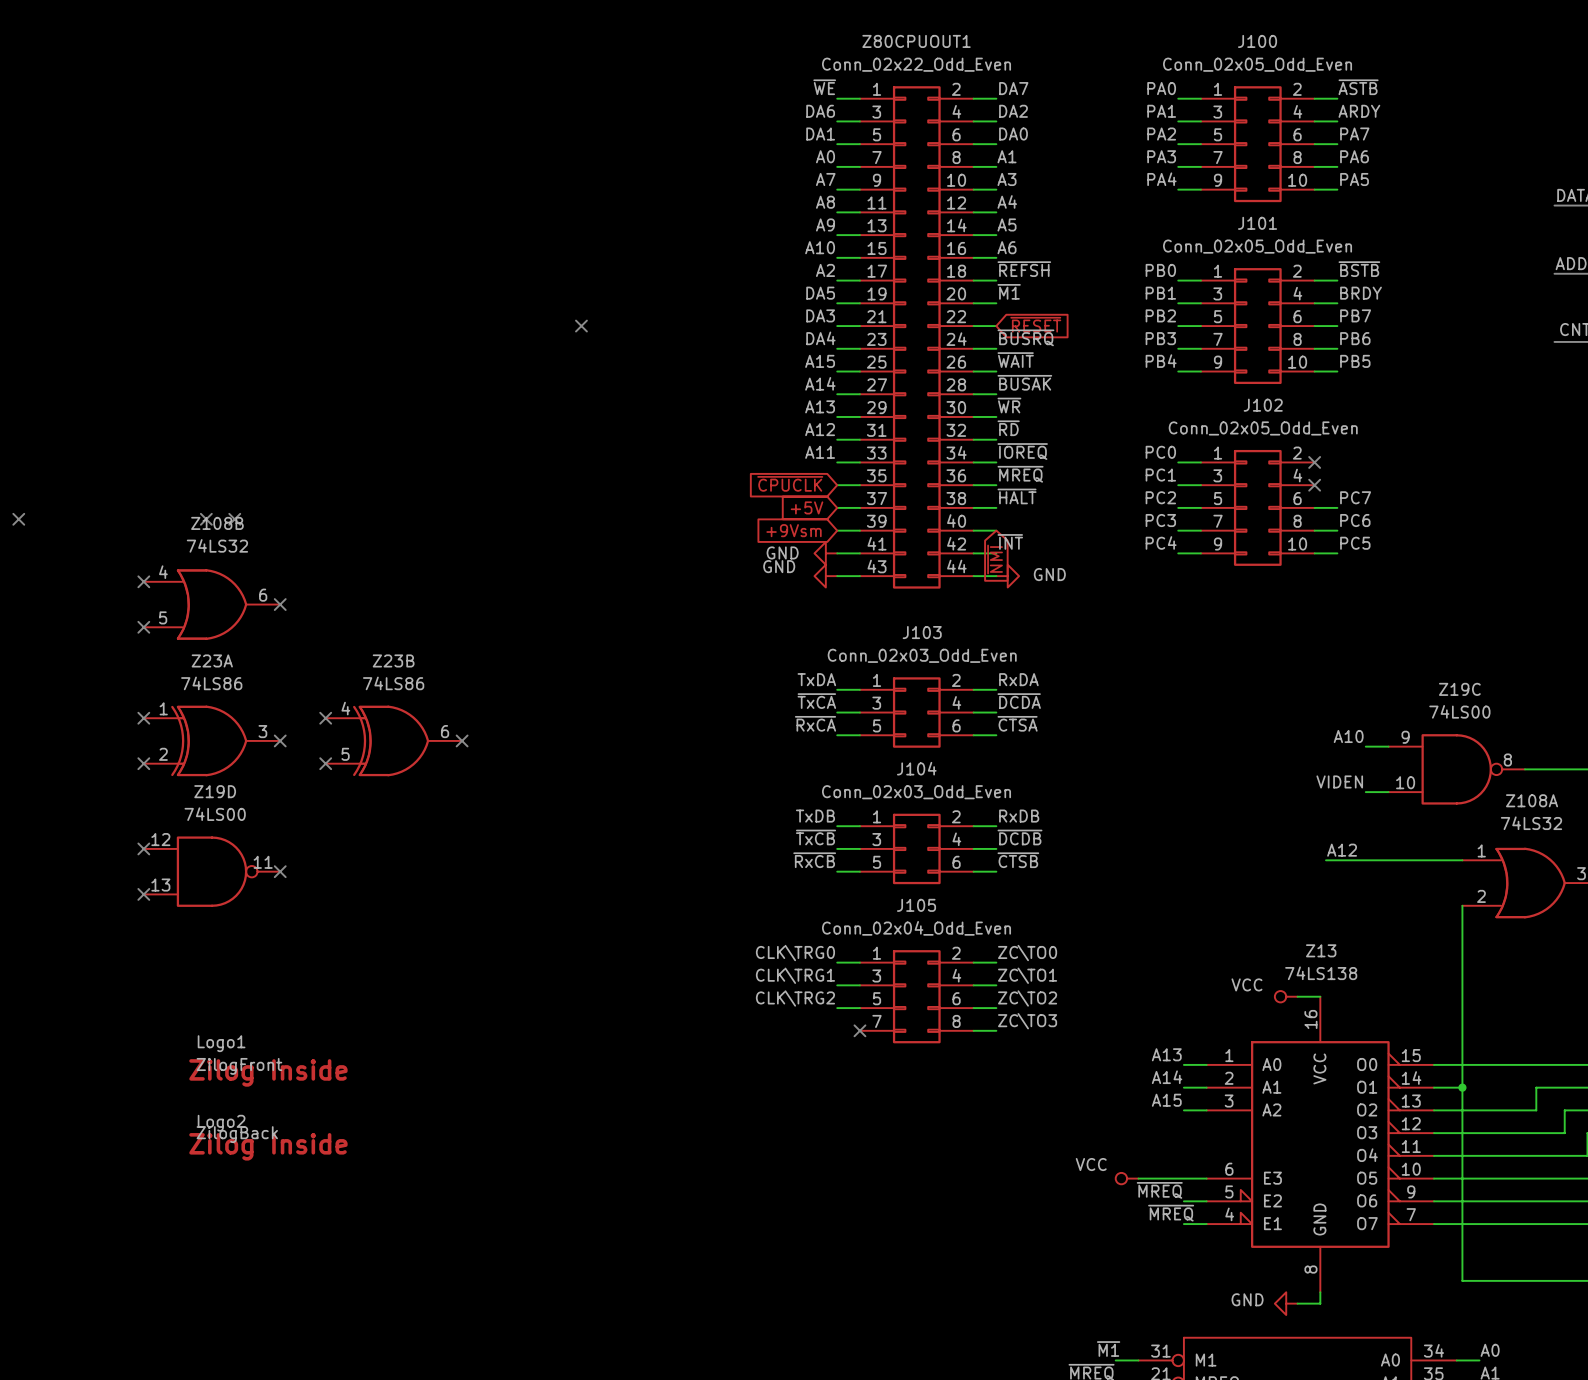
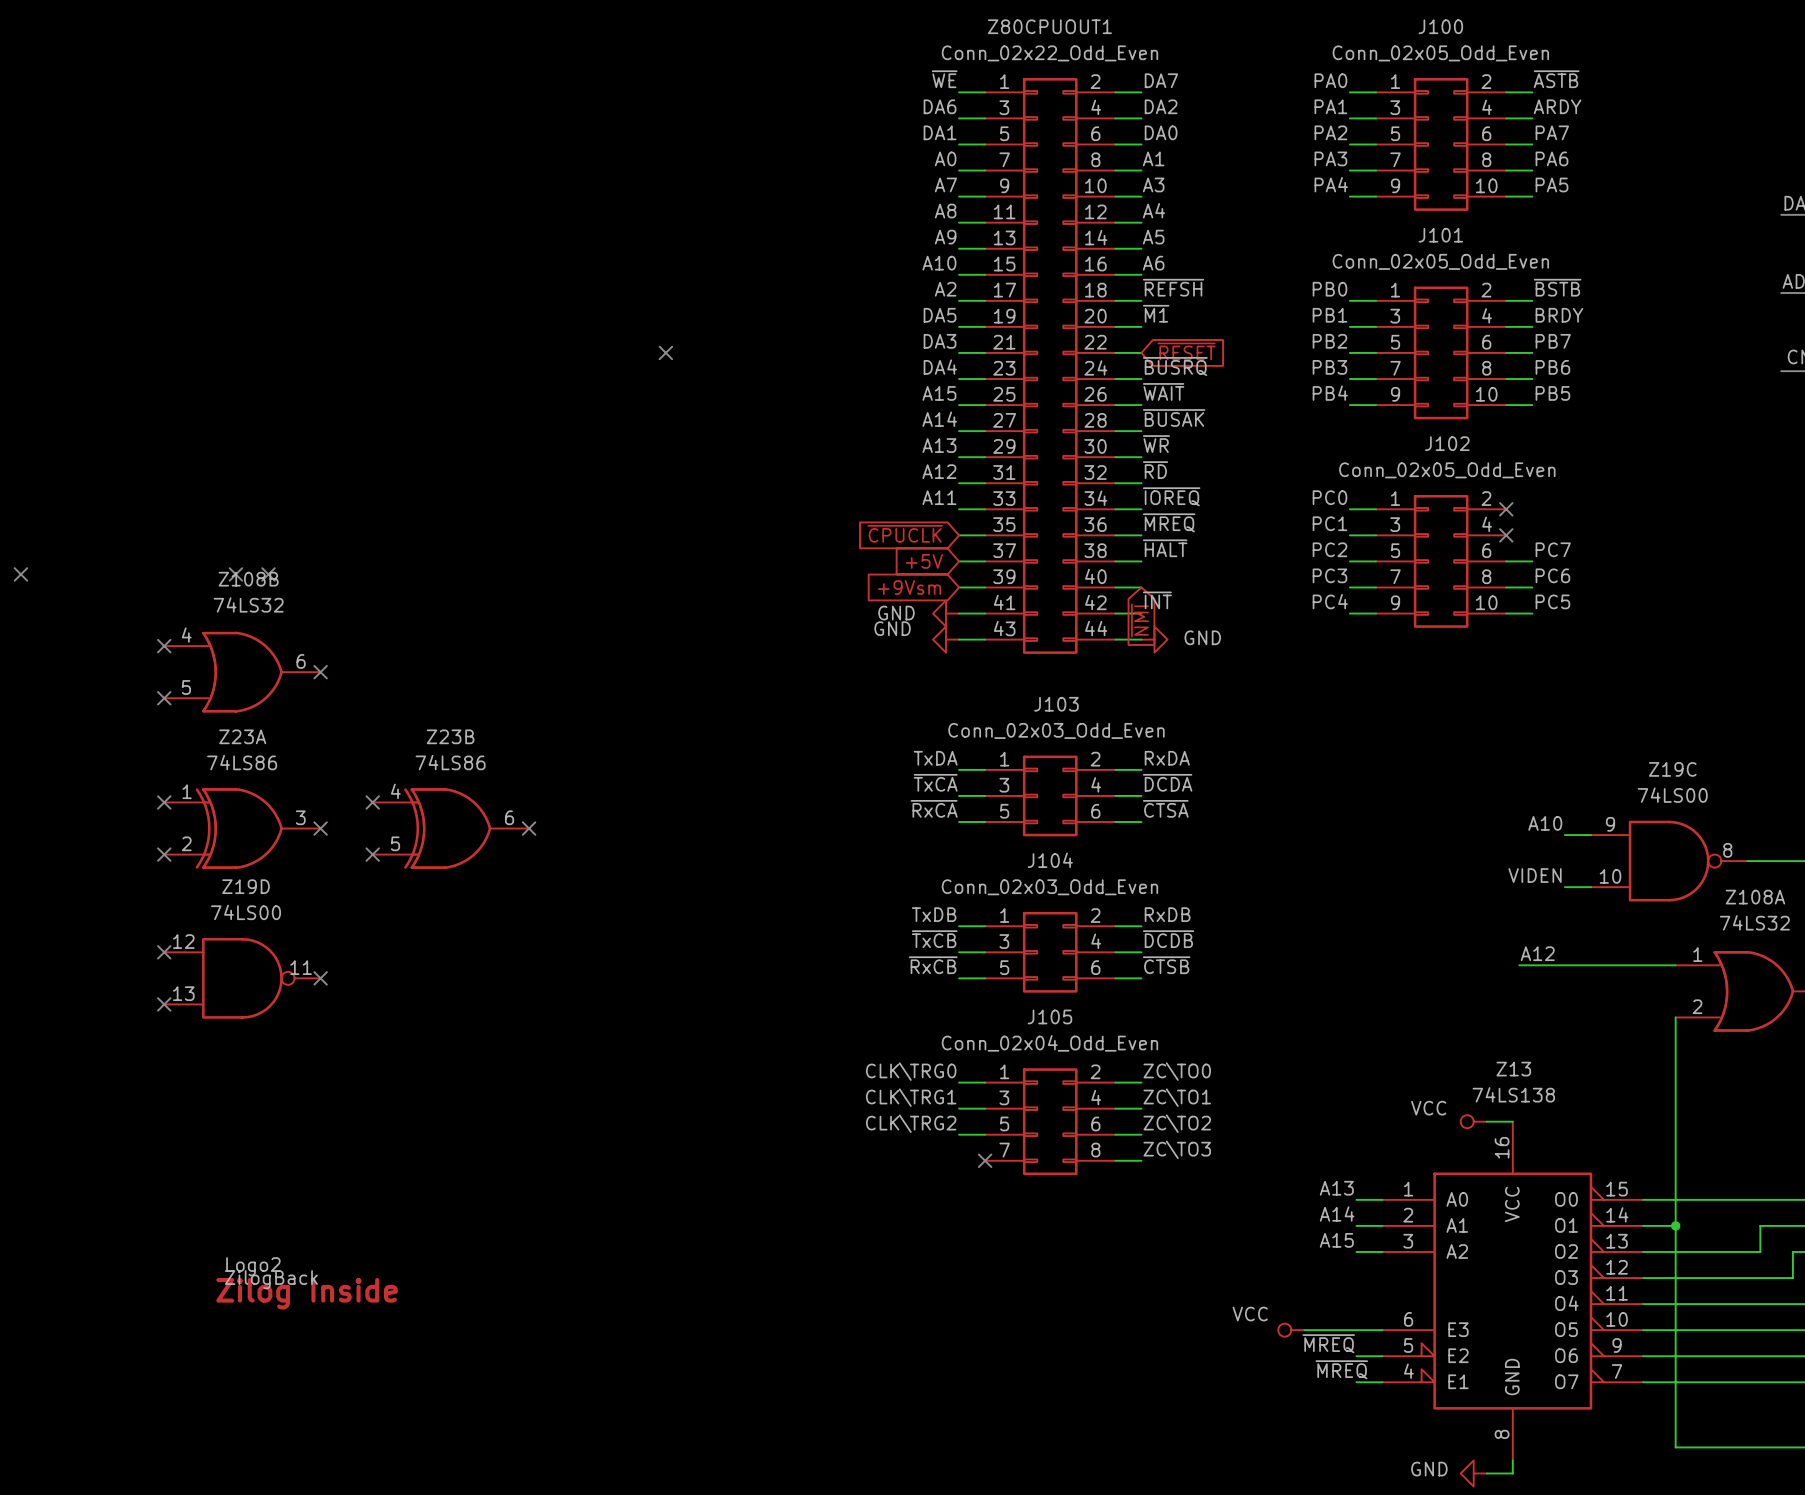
Logo1: ZilogFront (268, 1061) -> none

